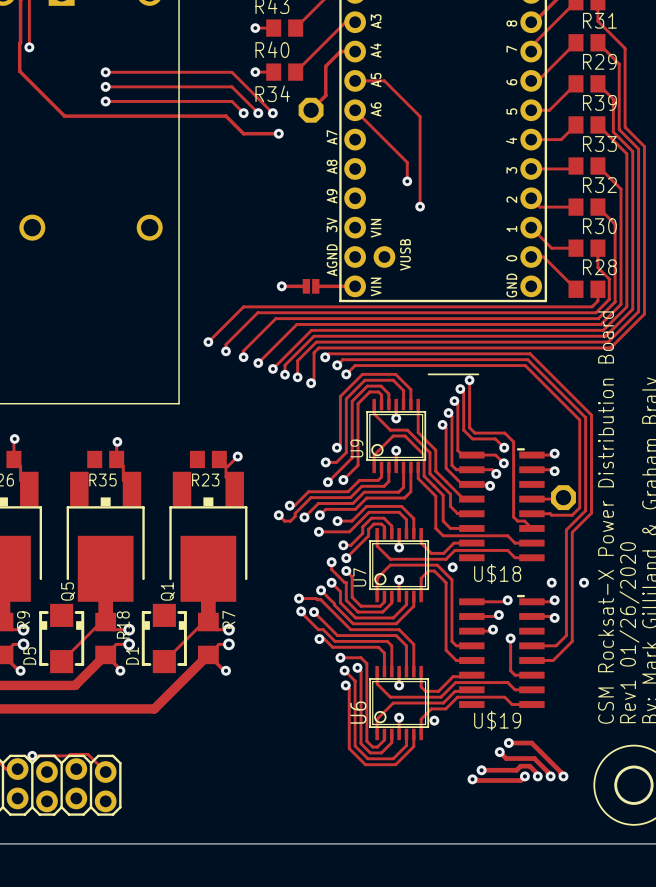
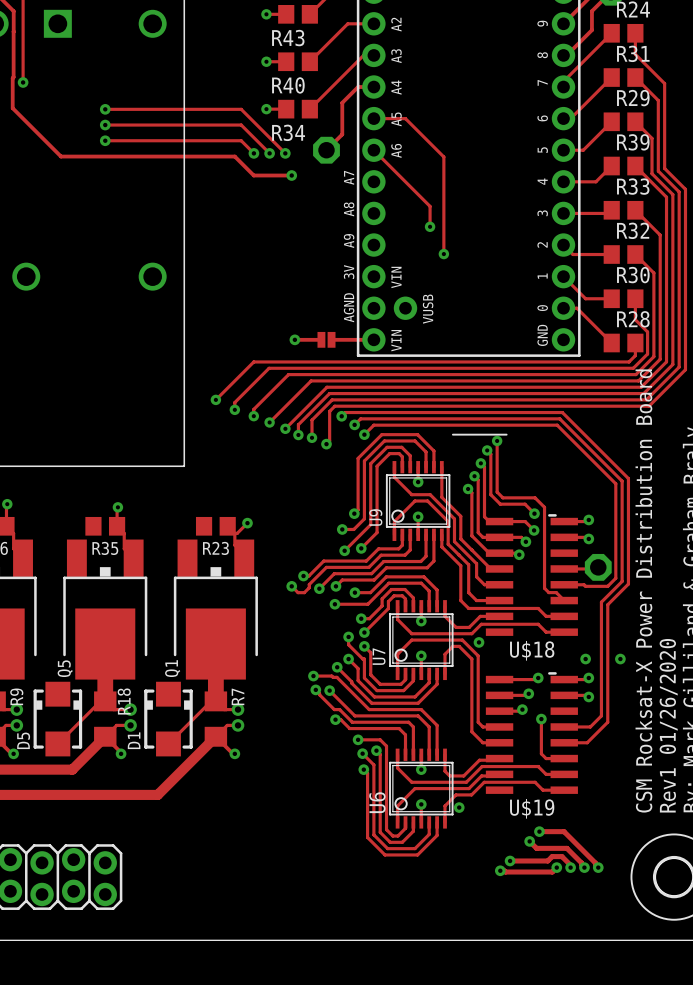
track: (32, 755) (88, 754) (105, 772) -> none
via: (32, 755) -> none

